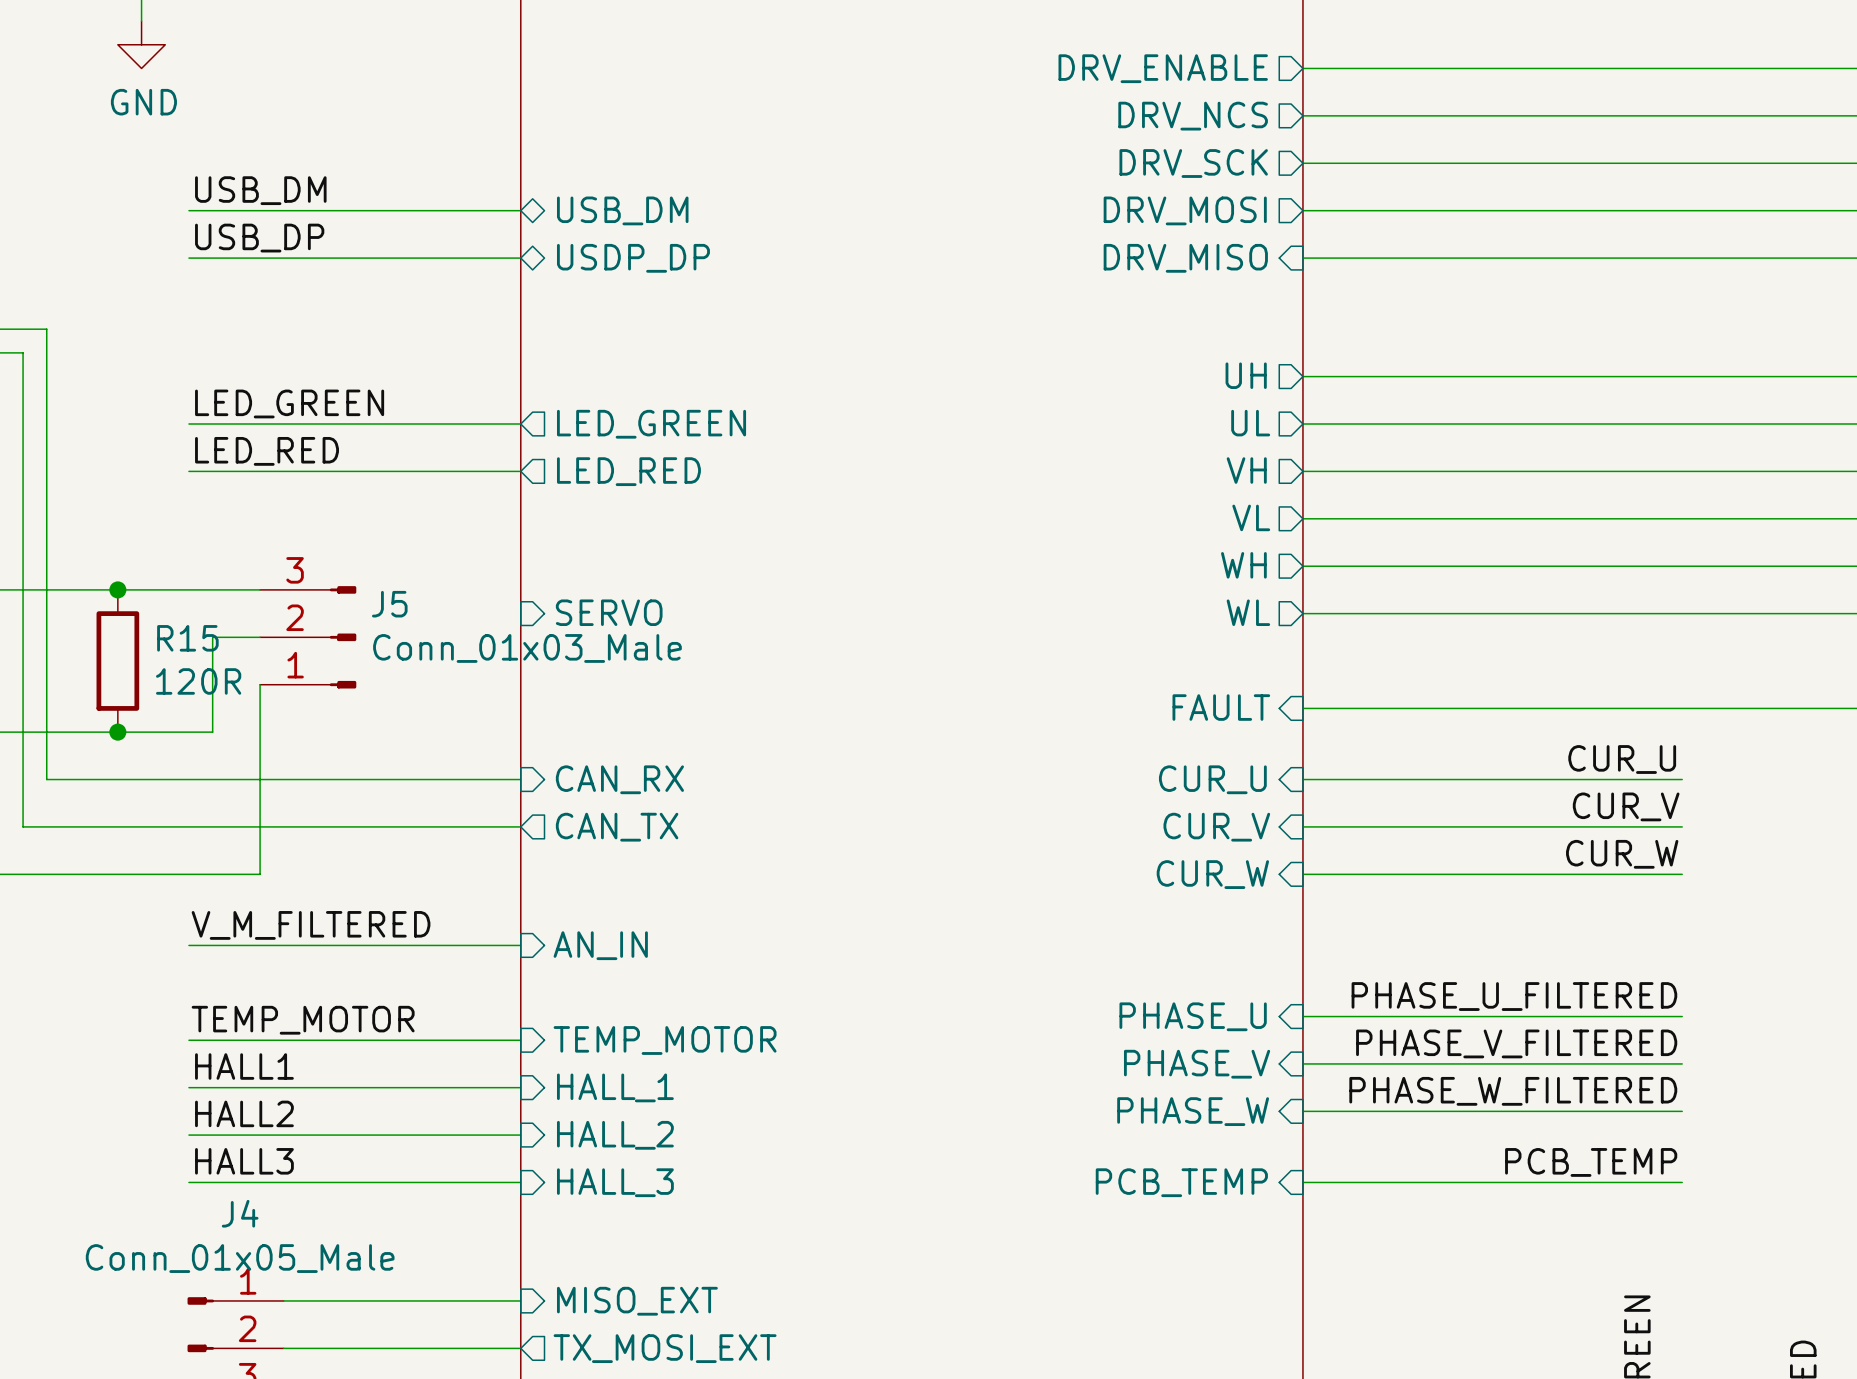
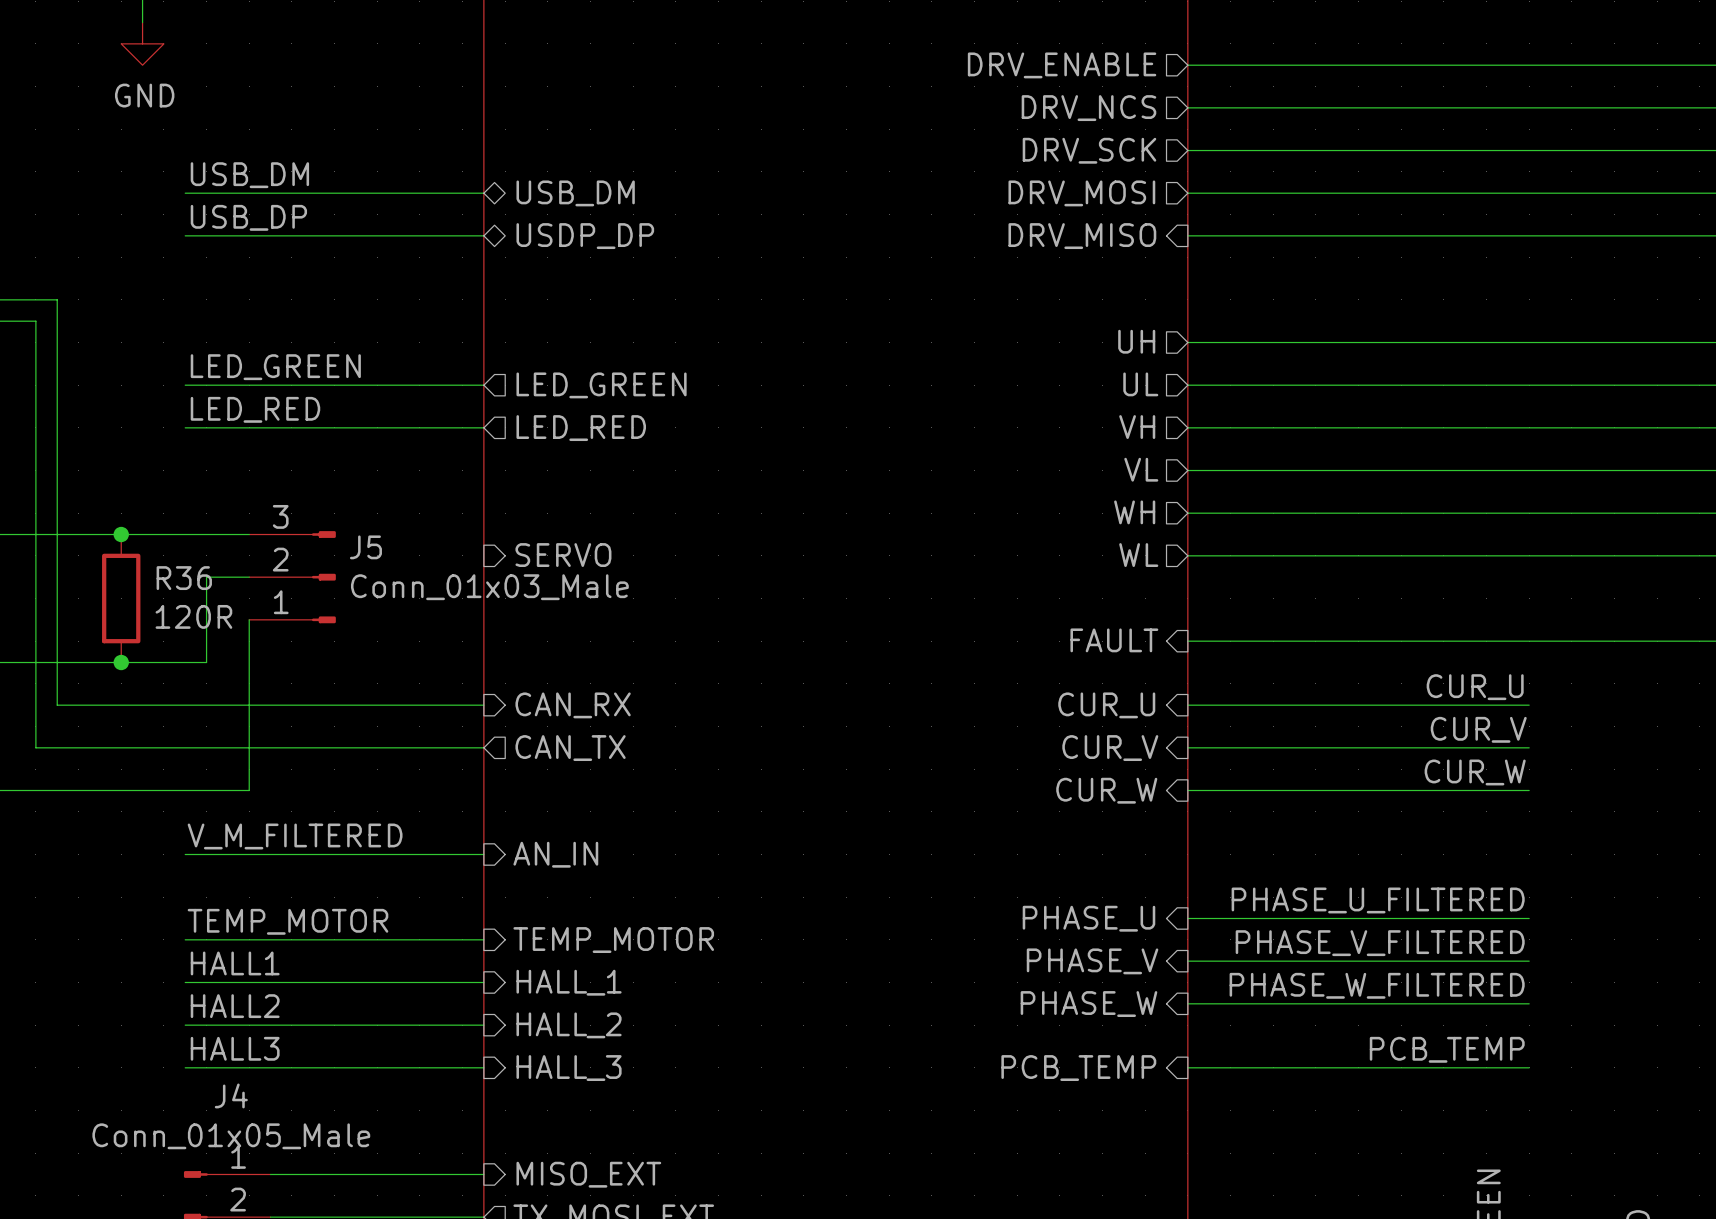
R15 name: R15 (187, 638) -> R36 (184, 578)

